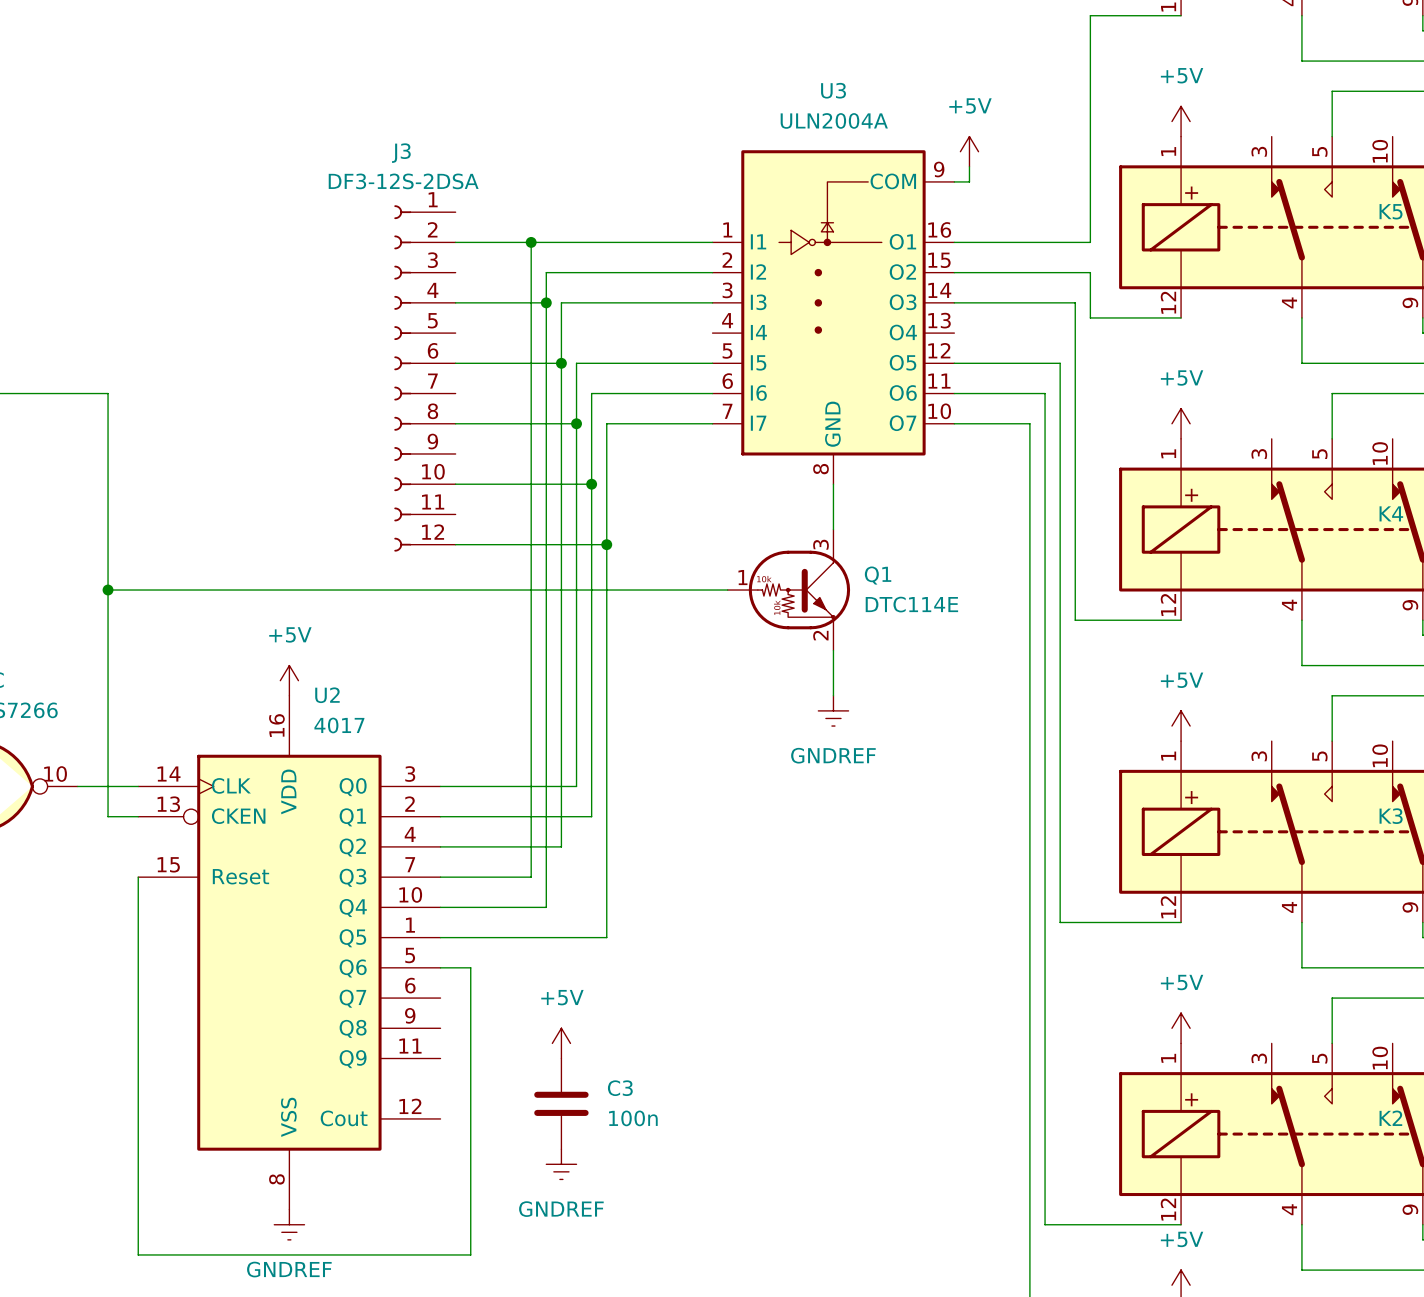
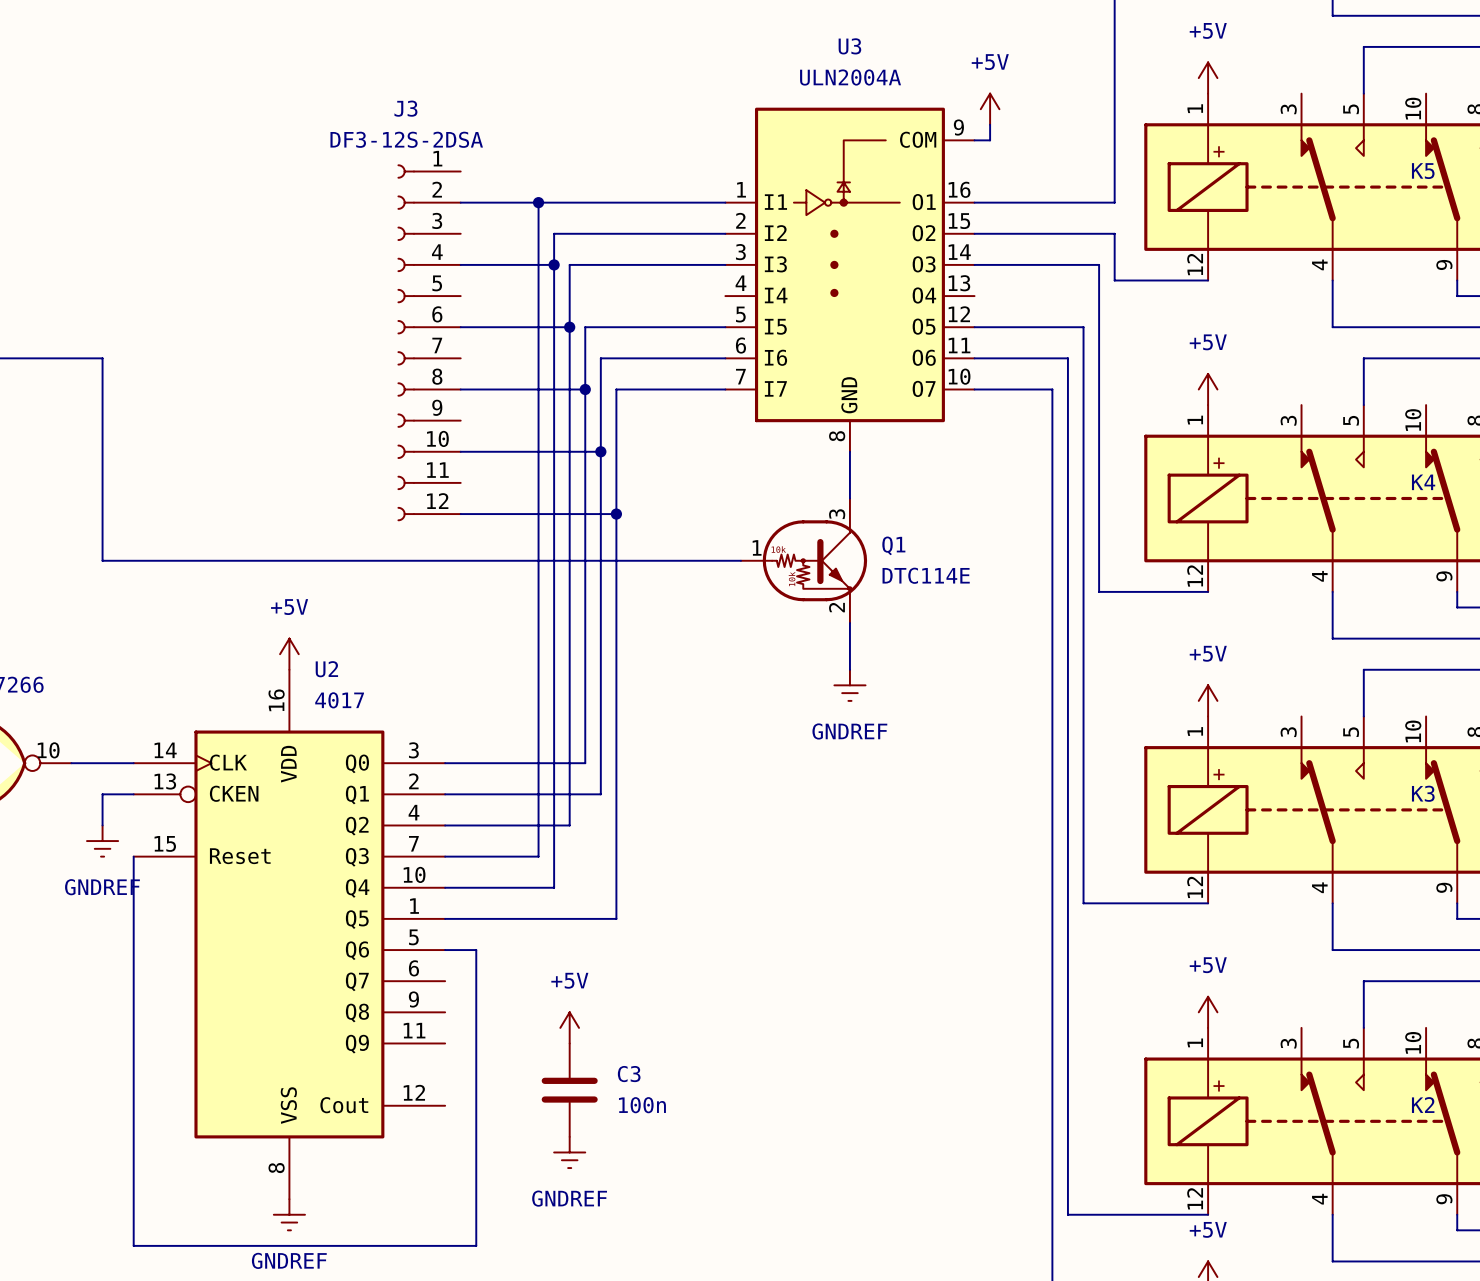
wire: (108, 590) (108, 816) -> (102, 825) (102, 794)
junction: (108, 590) -> none
power symbol: none -> GNDREF (102, 841)

